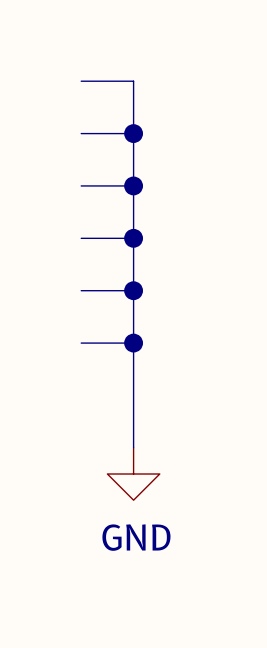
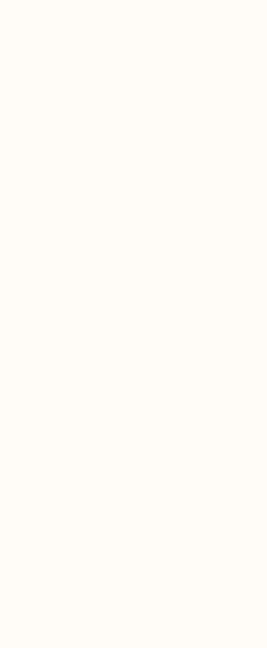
wire: (81, 81) (133, 81) (133, 447) -> none
wire: (81, 133) (133, 133) -> none
junction: (133, 133) -> none
wire: (81, 185) (133, 185) -> none
junction: (133, 185) -> none
wire: (81, 238) (133, 238) -> none
junction: (133, 238) -> none
wire: (81, 290) (133, 290) -> none
junction: (133, 290) -> none
wire: (81, 343) (133, 343) -> none
junction: (133, 343) -> none
power symbol: GND (133, 474) -> none

